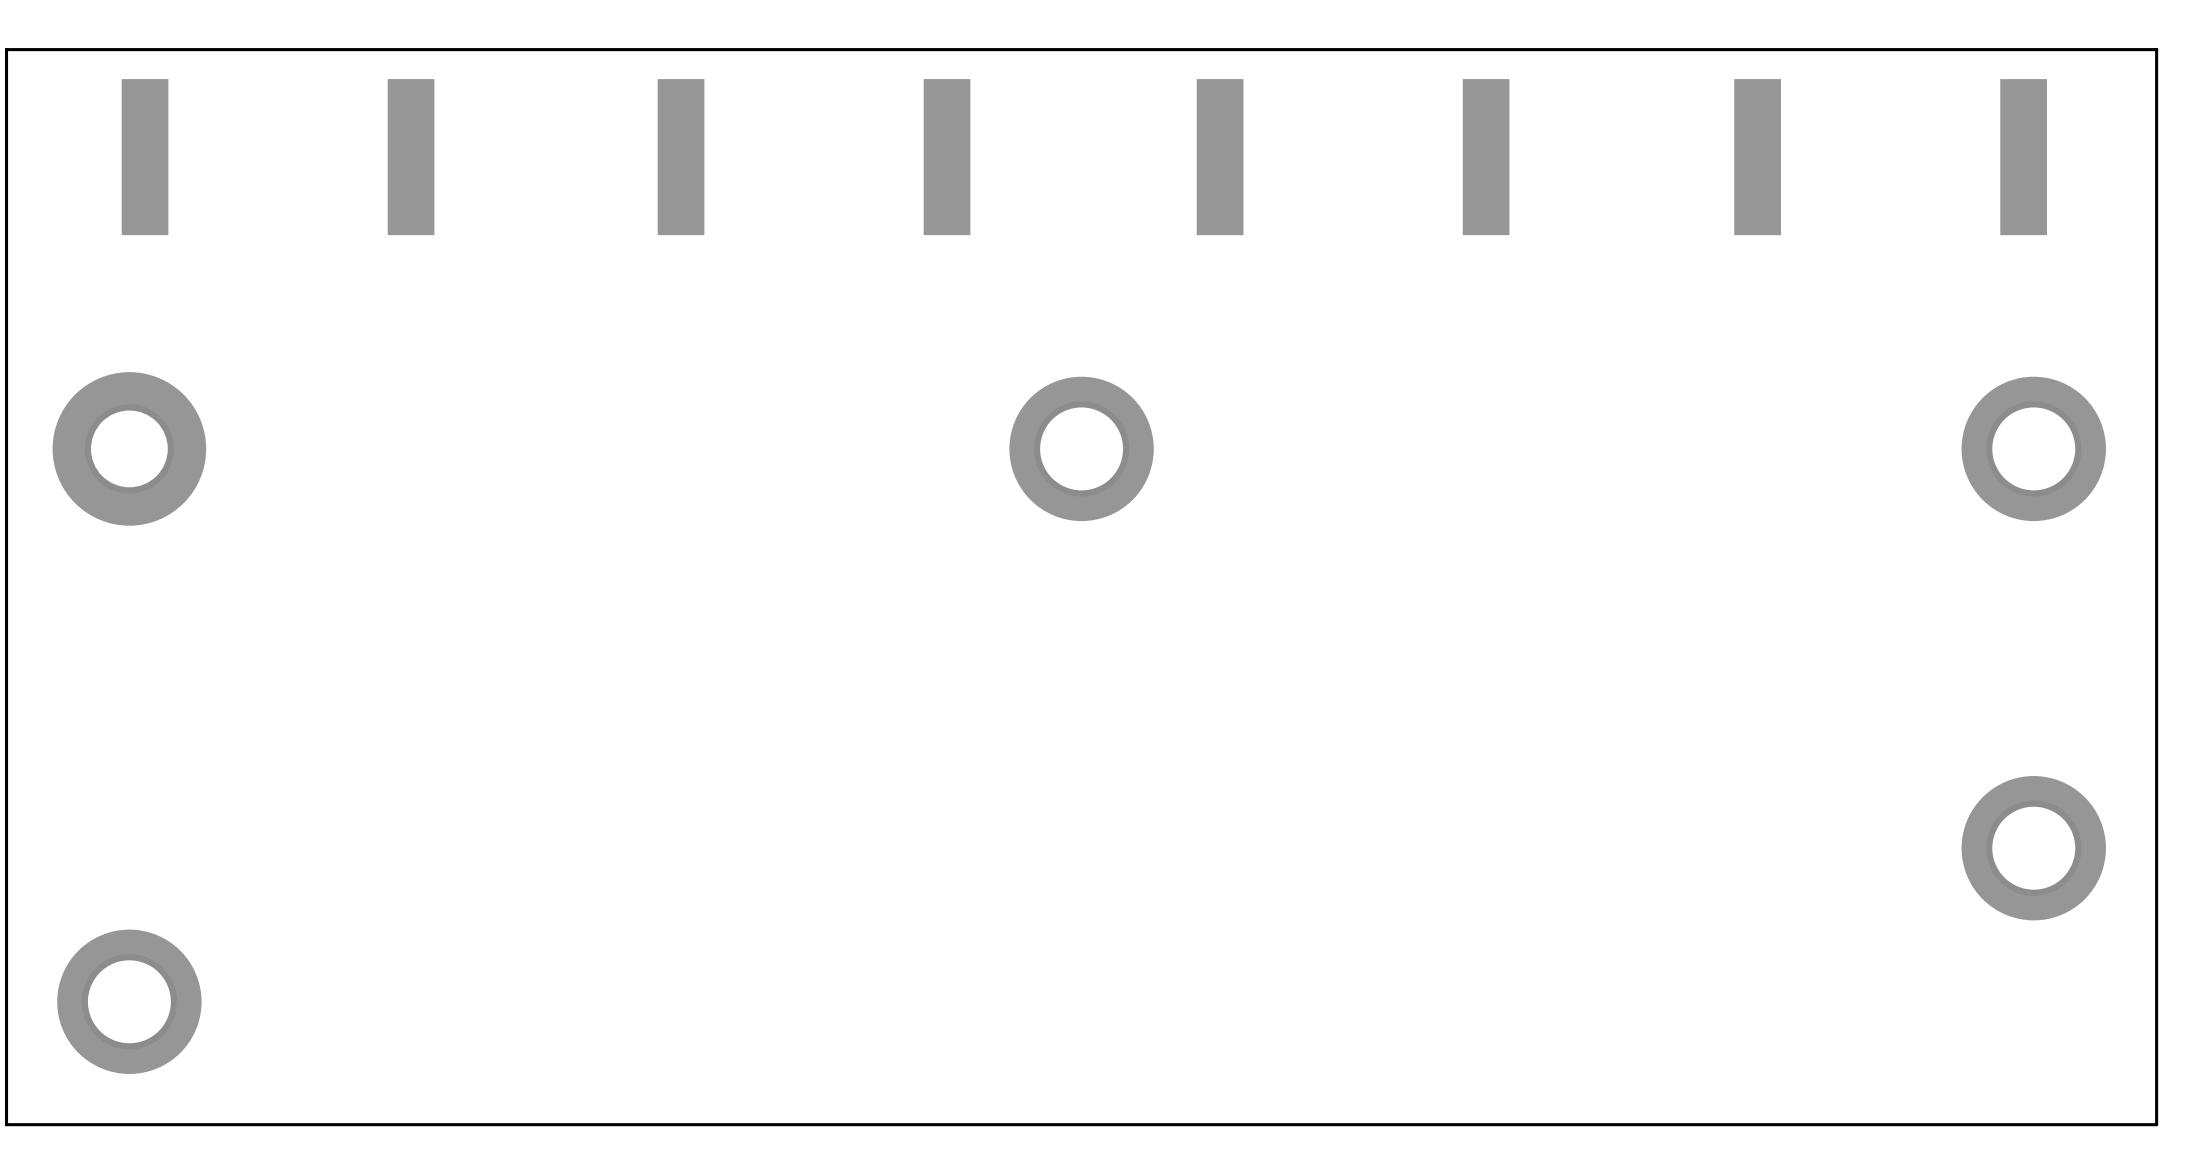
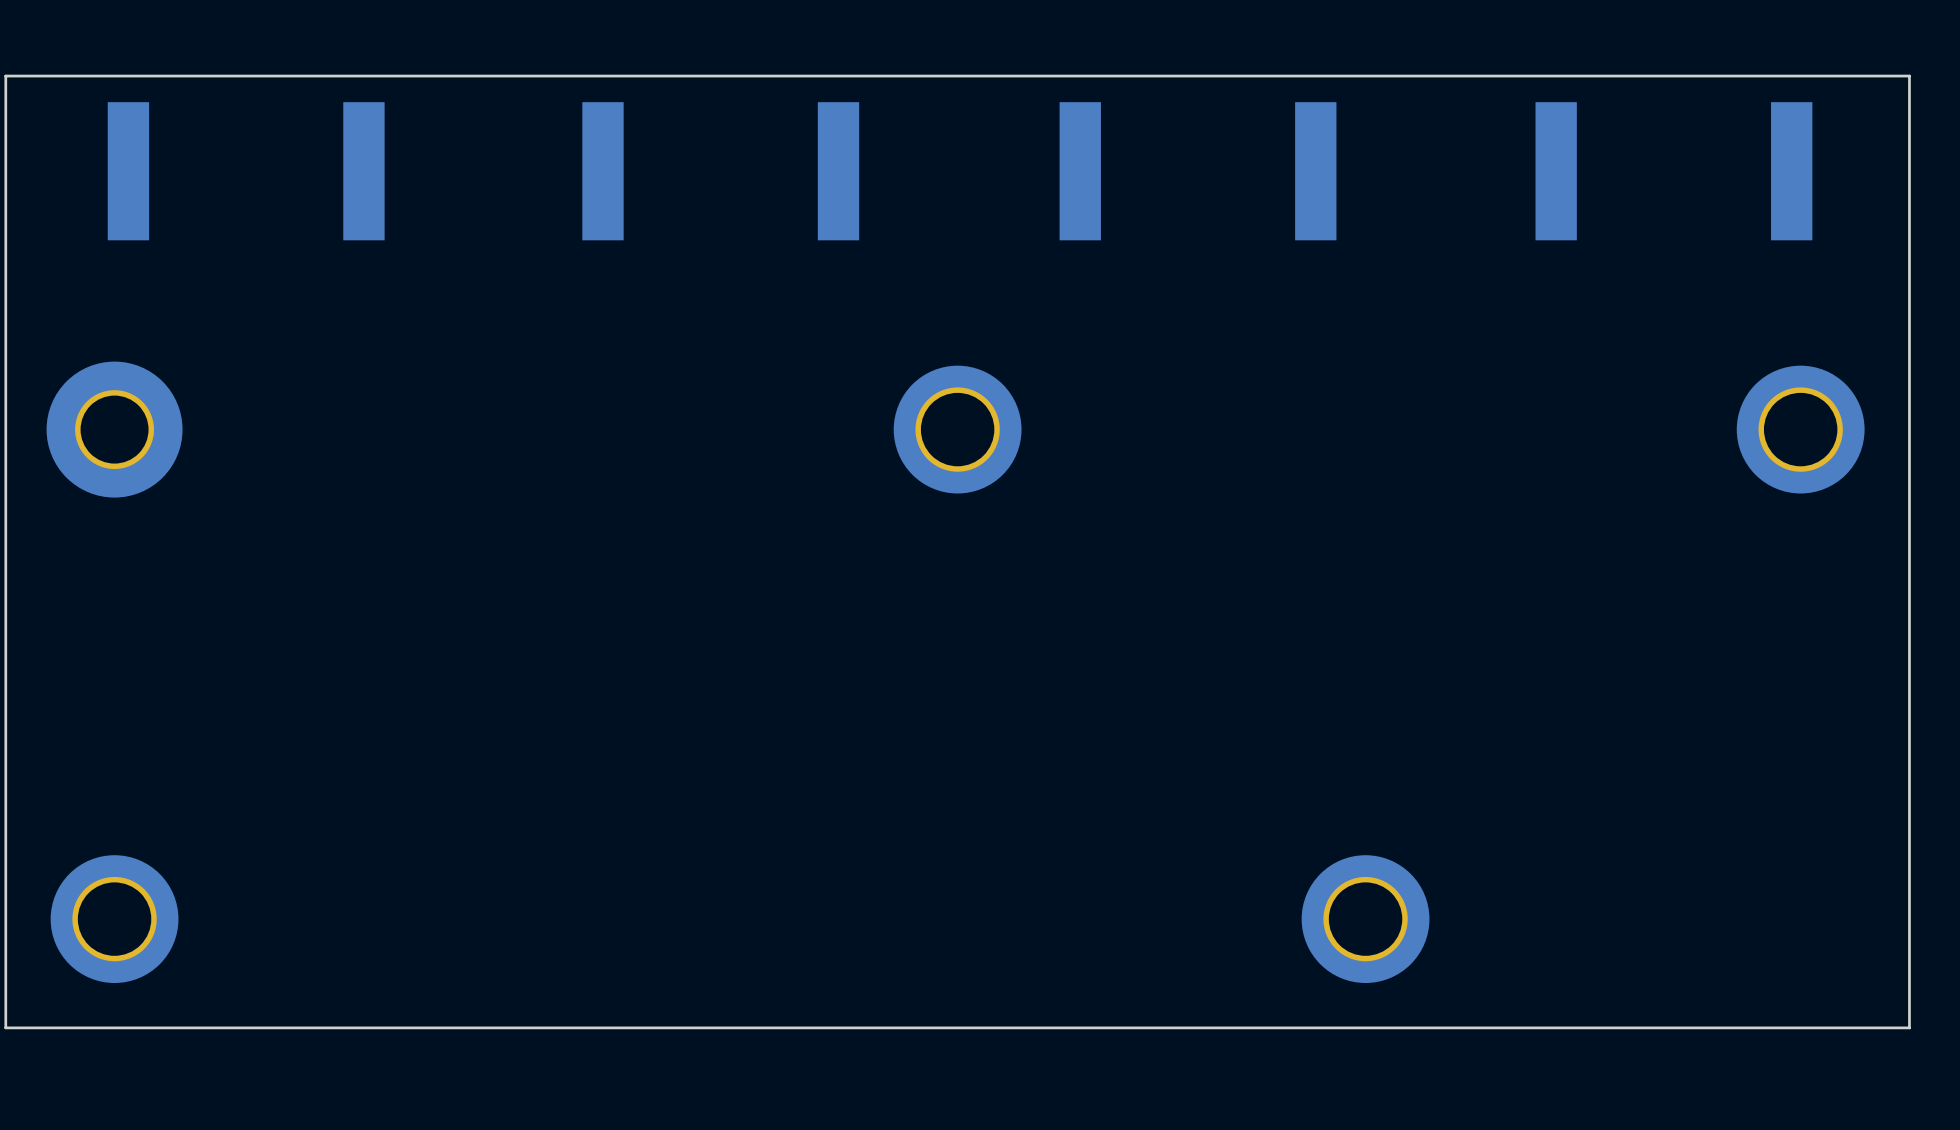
part position: (2033, 848) -> (1365, 919)

